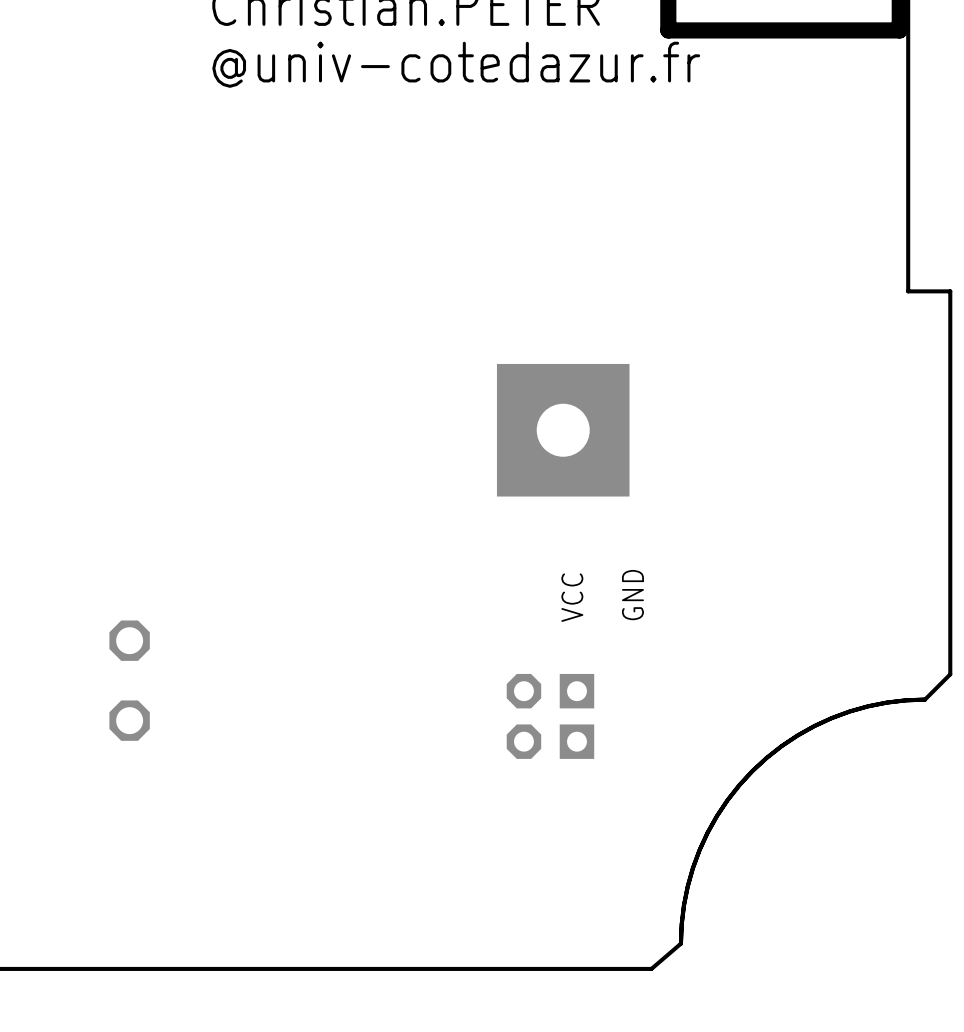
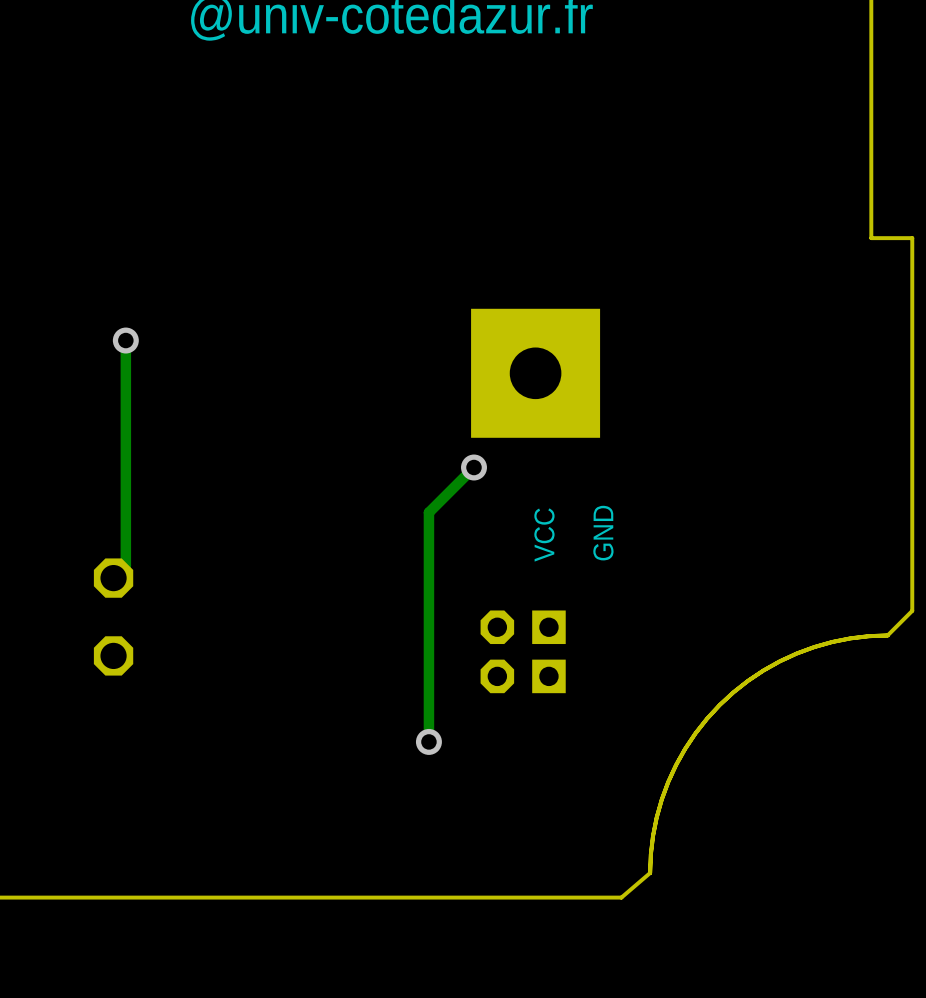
track: none -> (125, 340) (125, 565) (113, 578)
via: none -> (125, 340)
track: none -> (474, 467) (428, 512) (428, 741)
via: none -> (474, 467)
via: none -> (428, 741)

